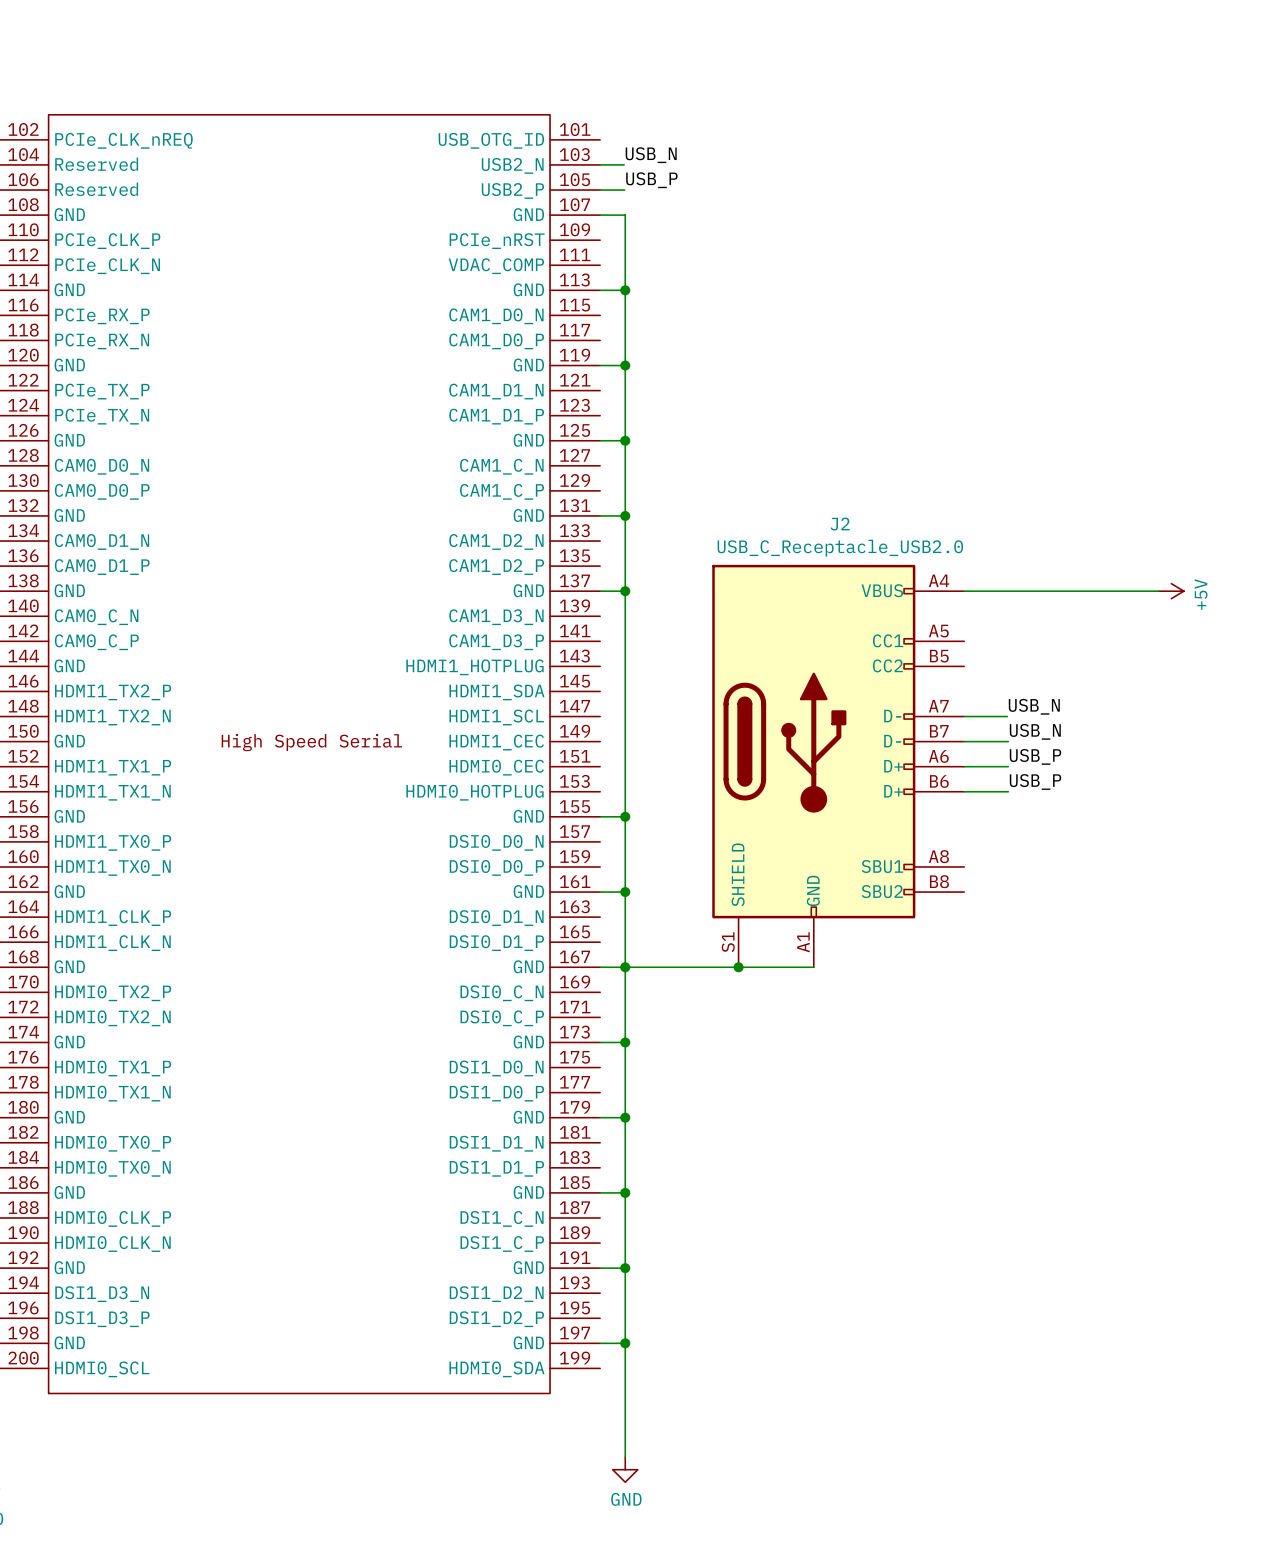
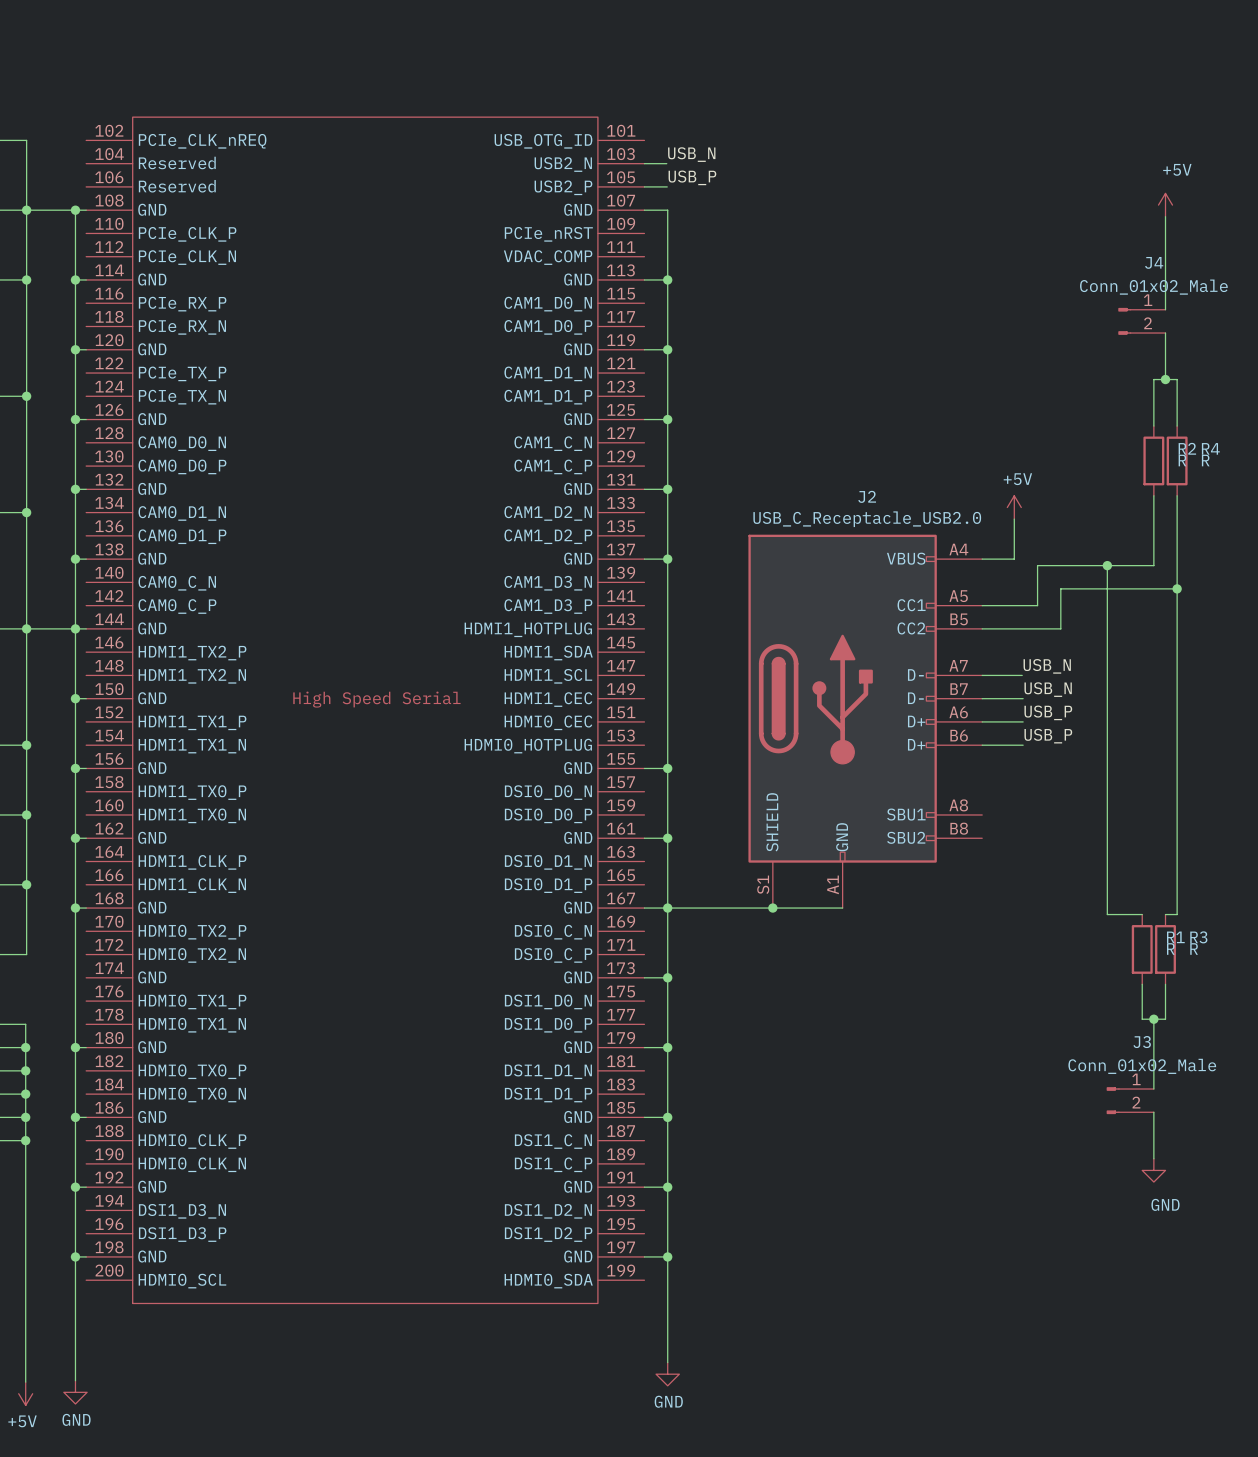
power symbol: none -> +5V (1165, 205)
wire: none -> (1165, 216) (1165, 309)
J4: none -> Conn_01x02_Male (1141, 321)
wire: none -> (1165, 333) (1165, 379)
junction: none -> (1165, 379)
wire: none -> (1153, 426) (1153, 379) (1177, 379) (1177, 426)
R2: none -> R (1153, 460)
R4: none -> R (1177, 460)
wire: none -> (1153, 495) (1153, 565) (1037, 565) (1037, 605) (982, 605)
wire: none -> (1177, 495) (1177, 914) (1165, 914)
wire: (998, 591) (1158, 591) -> (1014, 559) (1014, 519)
power symbol rotation: 0° (1171, 591) -> 90° counterclockwise (1014, 507)
power symbol position: +5V (1171, 591) -> +5V (1014, 507)
wire: none -> (1107, 565) (1107, 914) (1142, 914)
junction: none -> (1107, 565)
wire: none -> (1177, 588) (1060, 588) (1060, 628) (982, 628)
junction: none -> (1177, 588)
R1: none -> R (1142, 949)
R3: none -> R (1165, 949)
wire: none -> (1142, 984) (1142, 1019) (1165, 1019) (1165, 984)
wire: none -> (1153, 1019) (1153, 1089)
junction: none -> (1153, 1019)
J3: none -> Conn_01x02_Male (1130, 1100)
wire: none -> (1153, 1112) (1153, 1158)
power symbol: none -> GND (1153, 1170)

